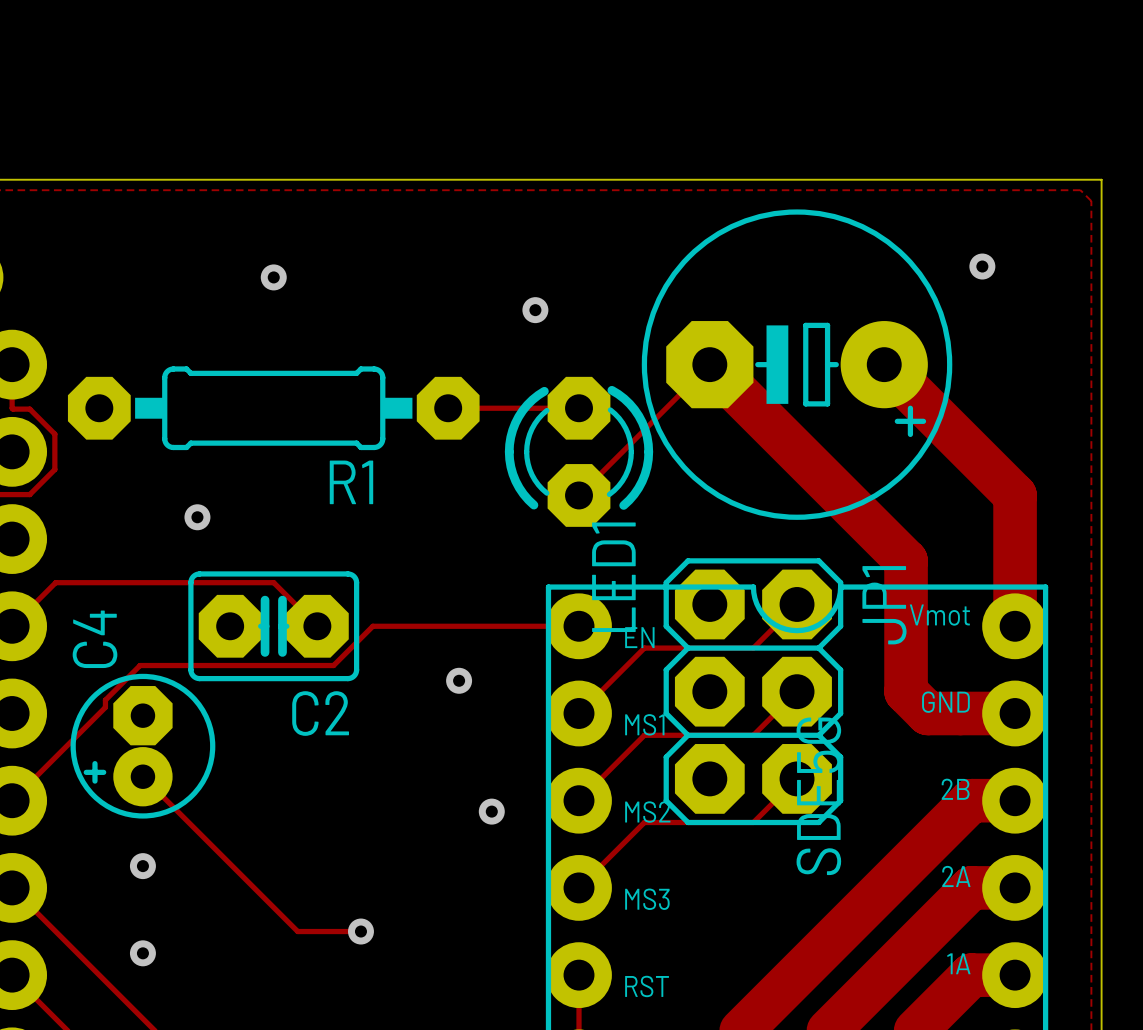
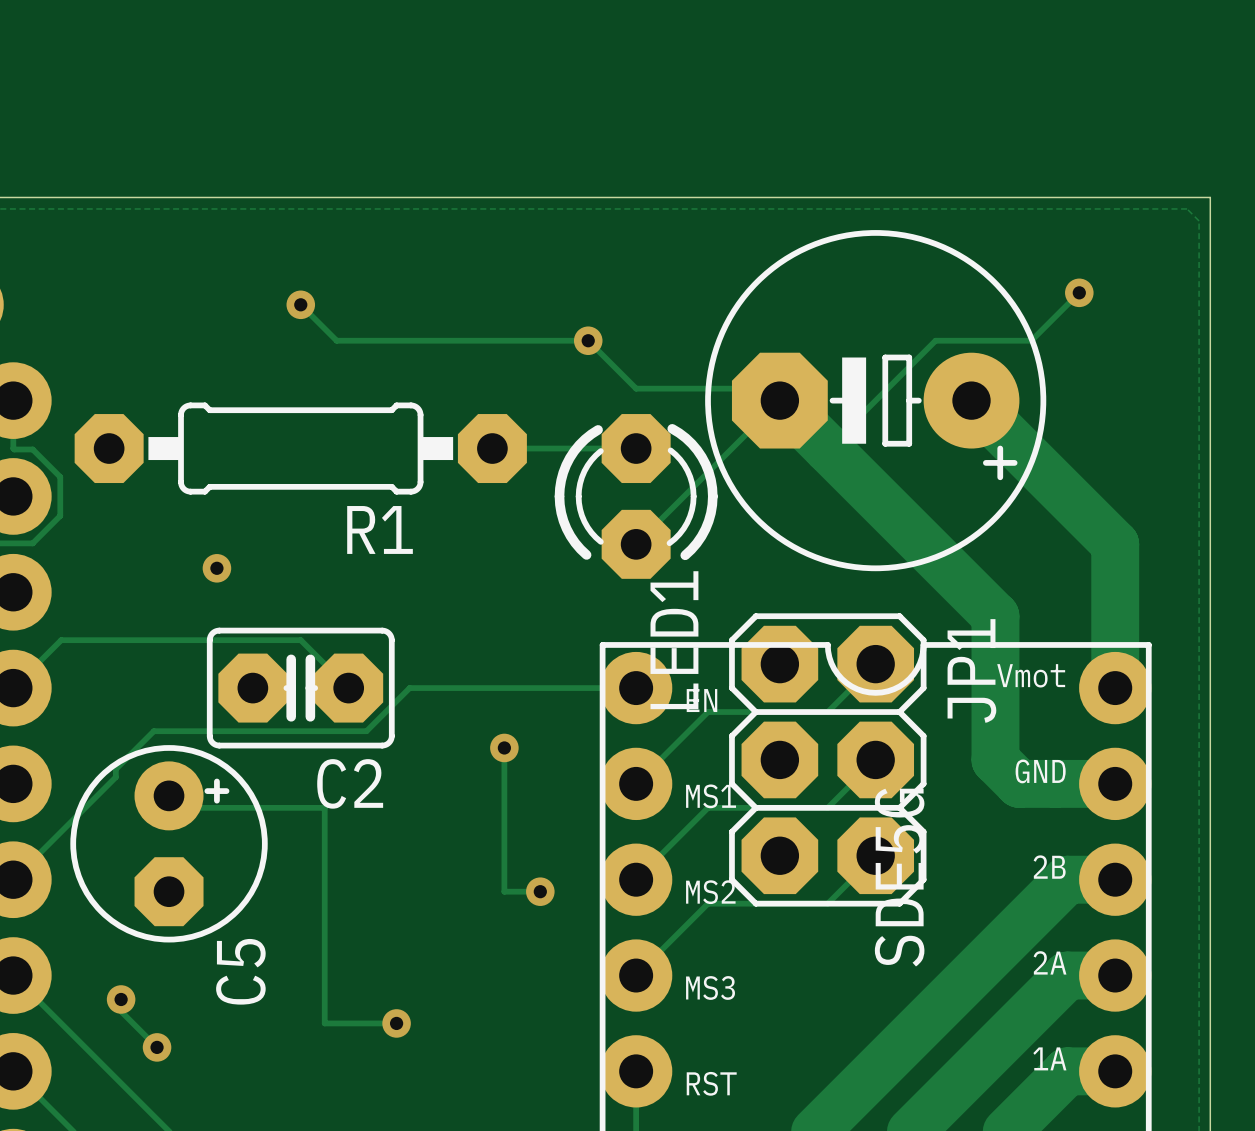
track: none -> (1079, 292) (1031, 340) (935, 340) (827, 448)
track: none -> (300, 304) (336, 340) (588, 340) (636, 388) (767, 388) (779, 400)
track: none -> (504, 747) (504, 891) (540, 891)
C4: (142, 746) -> none
C5: none -> (169, 843)
track: (142, 776) (297, 931) -> (169, 795) (181, 807) (324, 807) (324, 1023) (327, 1023)
via position: (142, 866) -> (121, 999)
track: none -> (121, 999) (121, 1011) (157, 1047)

